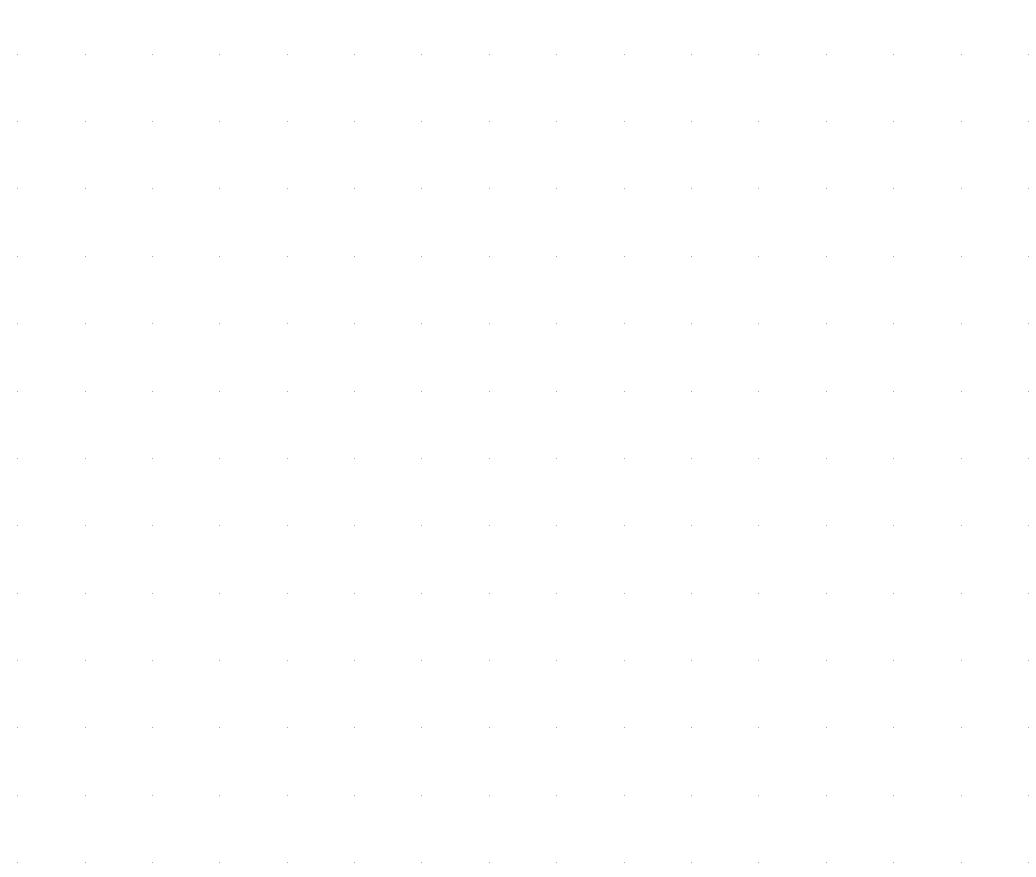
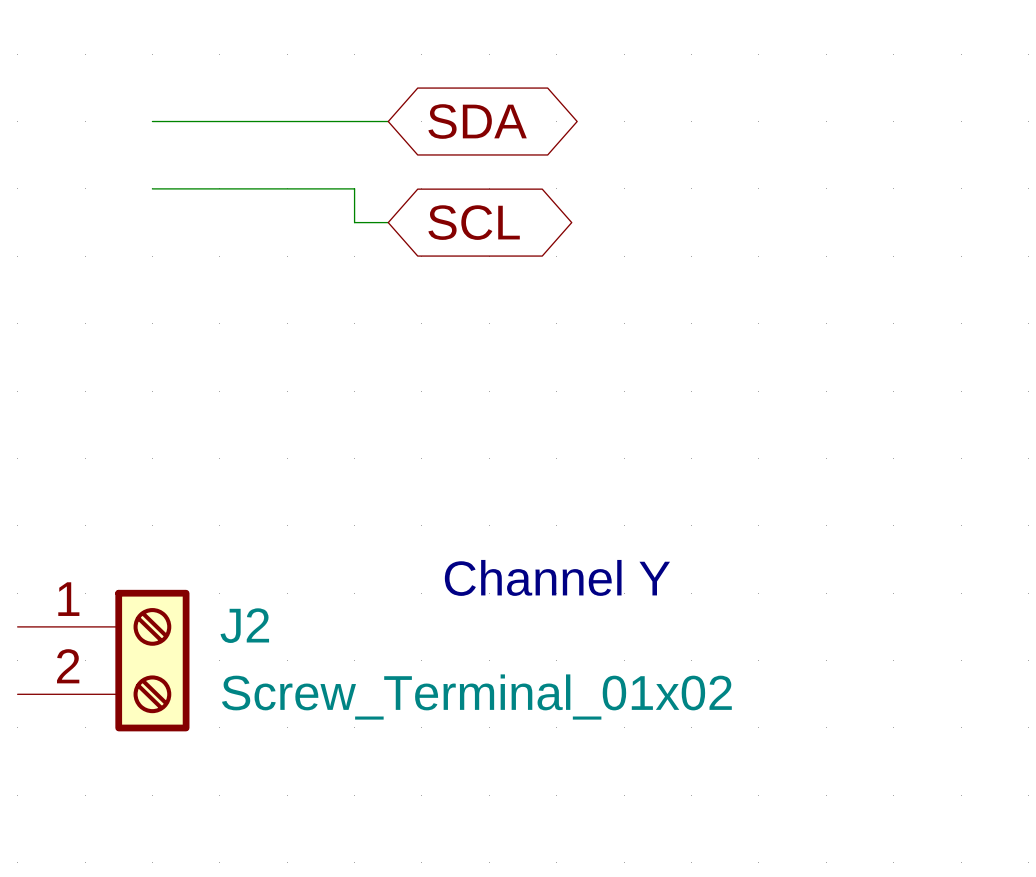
wire: none -> (152, 121) (388, 121)
global label: none -> SDA (477, 121)
wire: none -> (152, 188) (354, 188) (354, 222) (388, 222)
global label: none -> SCL (474, 222)
text: none -> Channel Y (557, 577)
J2: none -> Screw_Terminal_01x02 (103, 660)

